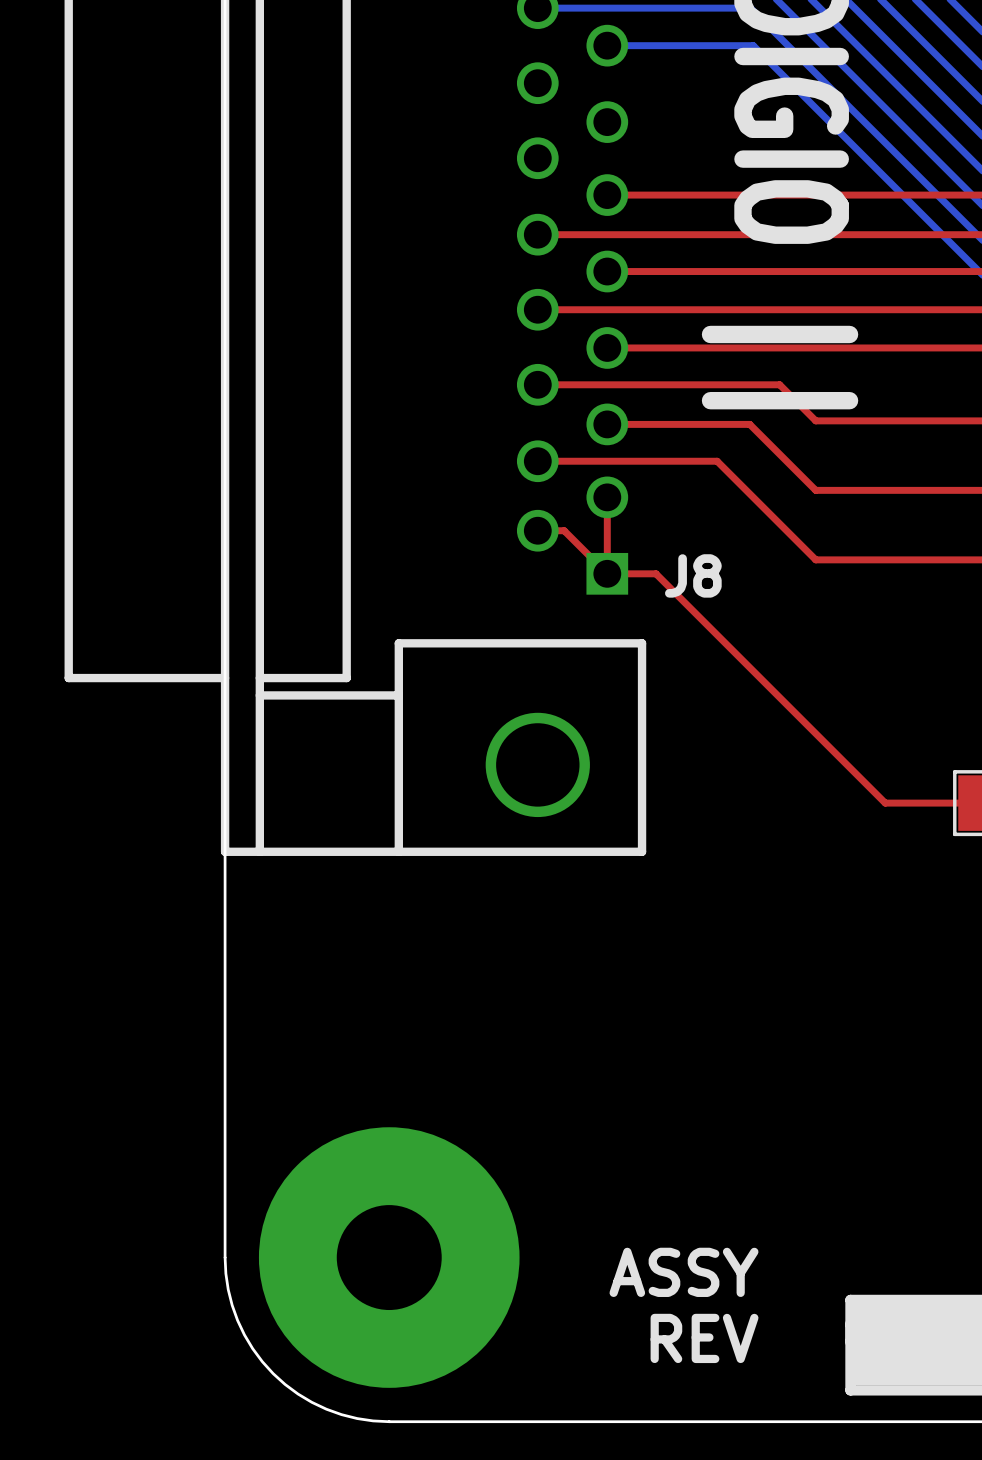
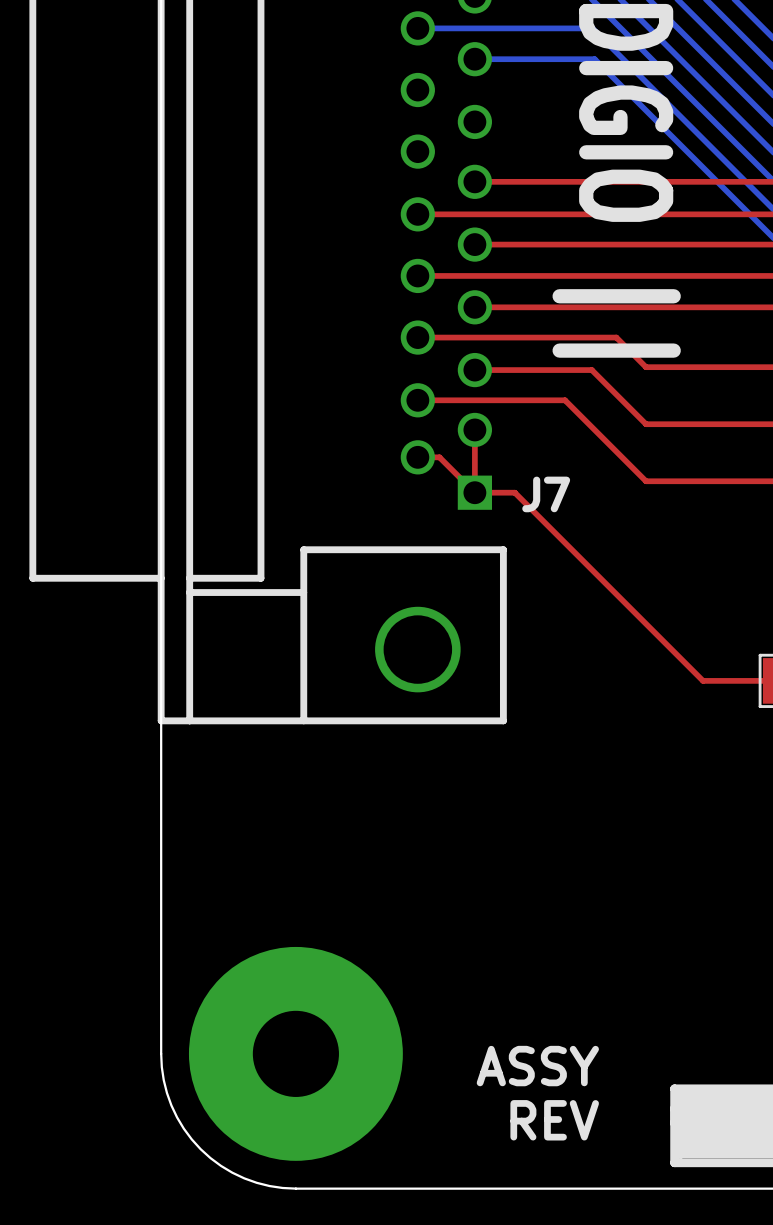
J8 name: J8 (693, 575) -> J7 (546, 494)

